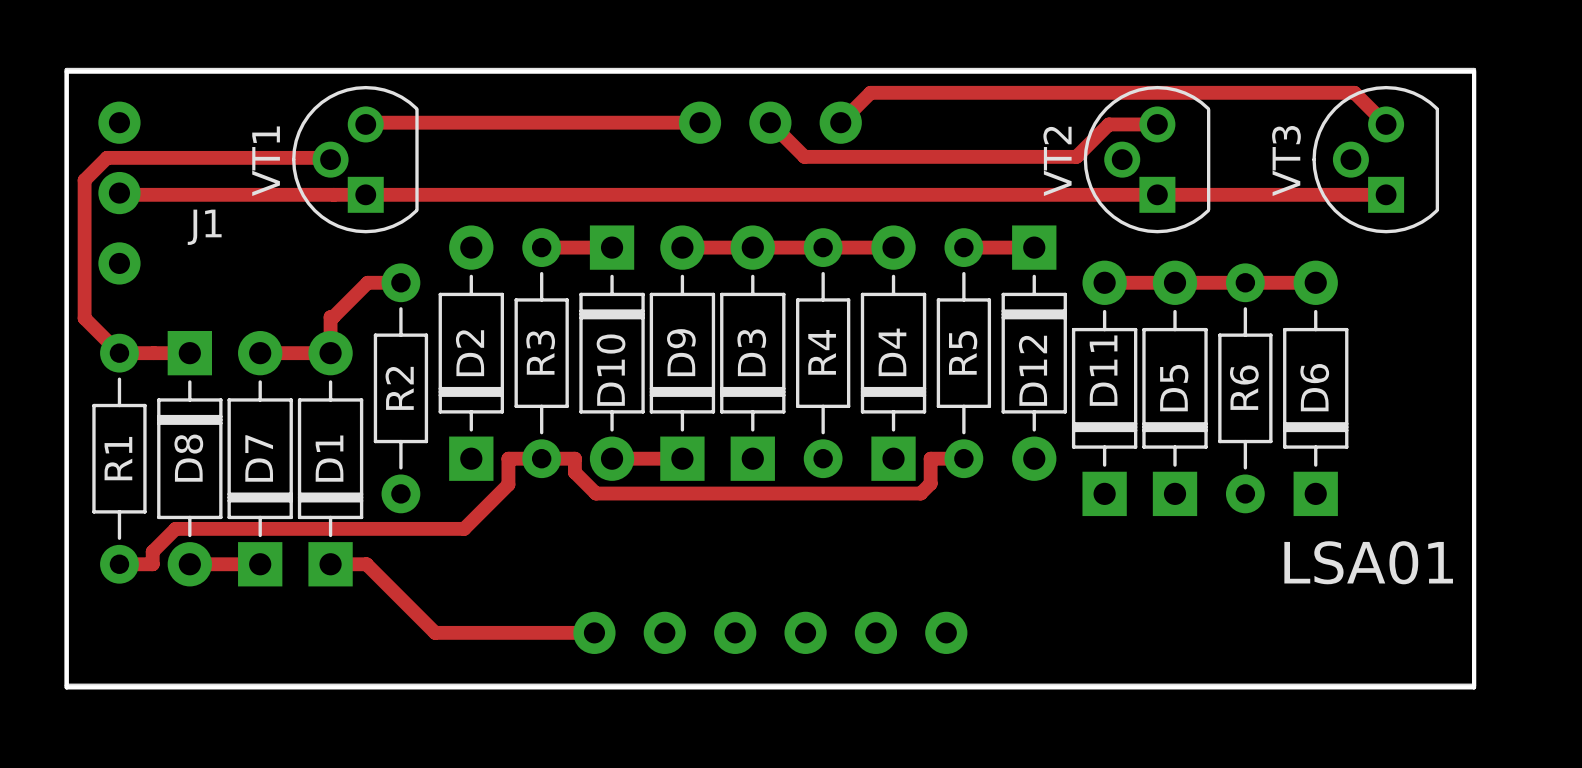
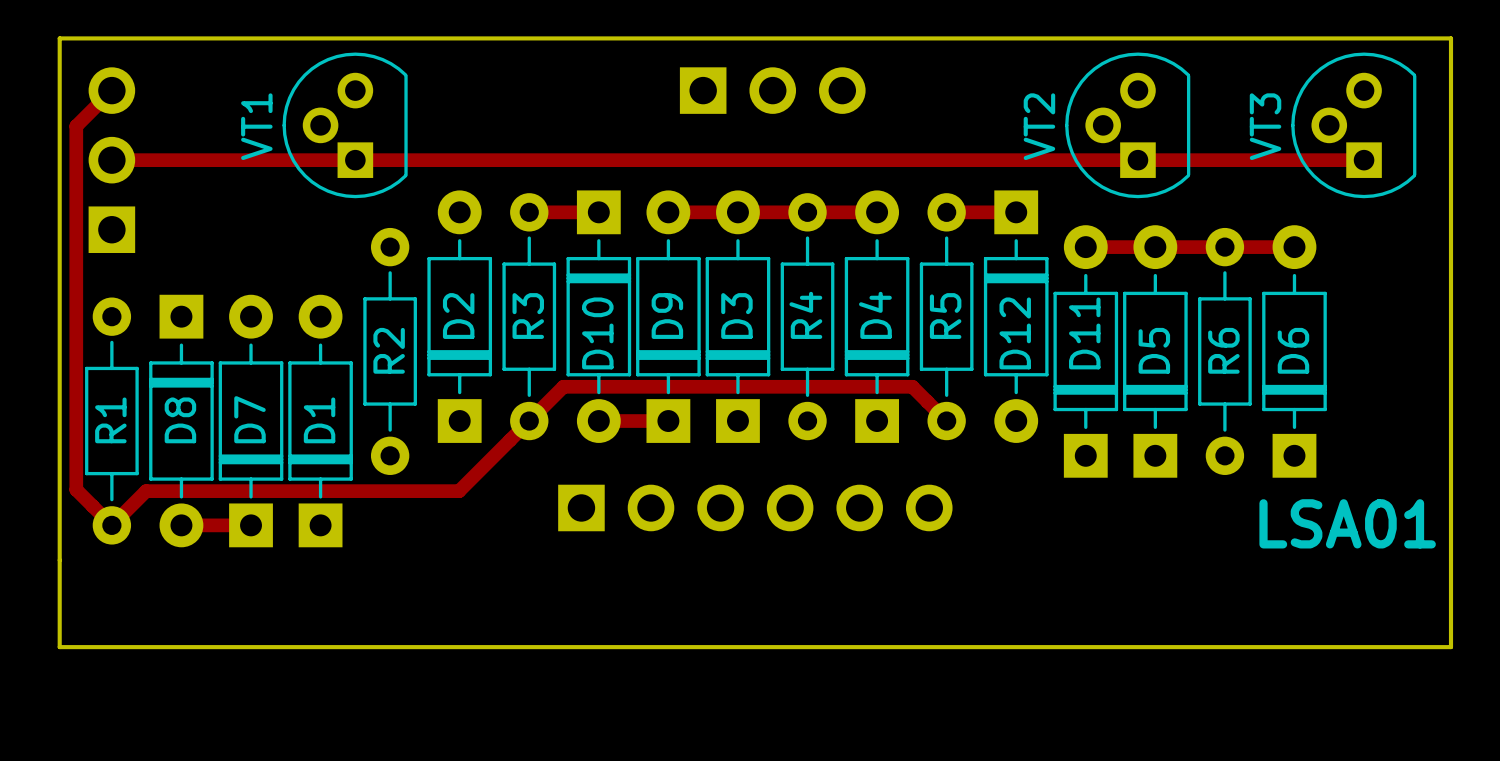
track: (700, 122) (367, 122) (365, 124) -> none
track: (770, 122) (804, 156) (1076, 156) (1108, 124) (1157, 124) -> none
track: (840, 122) (870, 92) (1354, 92) (1386, 124) -> none
part: none -> (772, 90)
track: (330, 159) (328, 157) (107, 157) (84, 180) (84, 318) (119, 353) (189, 353) -> none
part: none -> (111, 160)
track: (400, 282) (367, 282) (333, 317) (330, 317) (330, 353) (260, 353) -> none
J1: (770, 377) -> none
track: (963, 458) (930, 458) (930, 483) (920, 493) (595, 493) (574, 472) (574, 458) (508, 458) (508, 484) (464, 528) (175, 528) (152, 551) (152, 564) (119, 564) -> (946, 421) (912, 386) (563, 386) (459, 491) (146, 491) (111, 525) (76, 489) (76, 126) (111, 90)
part: none -> (755, 507)
track: (330, 564) (366, 564) (435, 632) (594, 632) -> none

